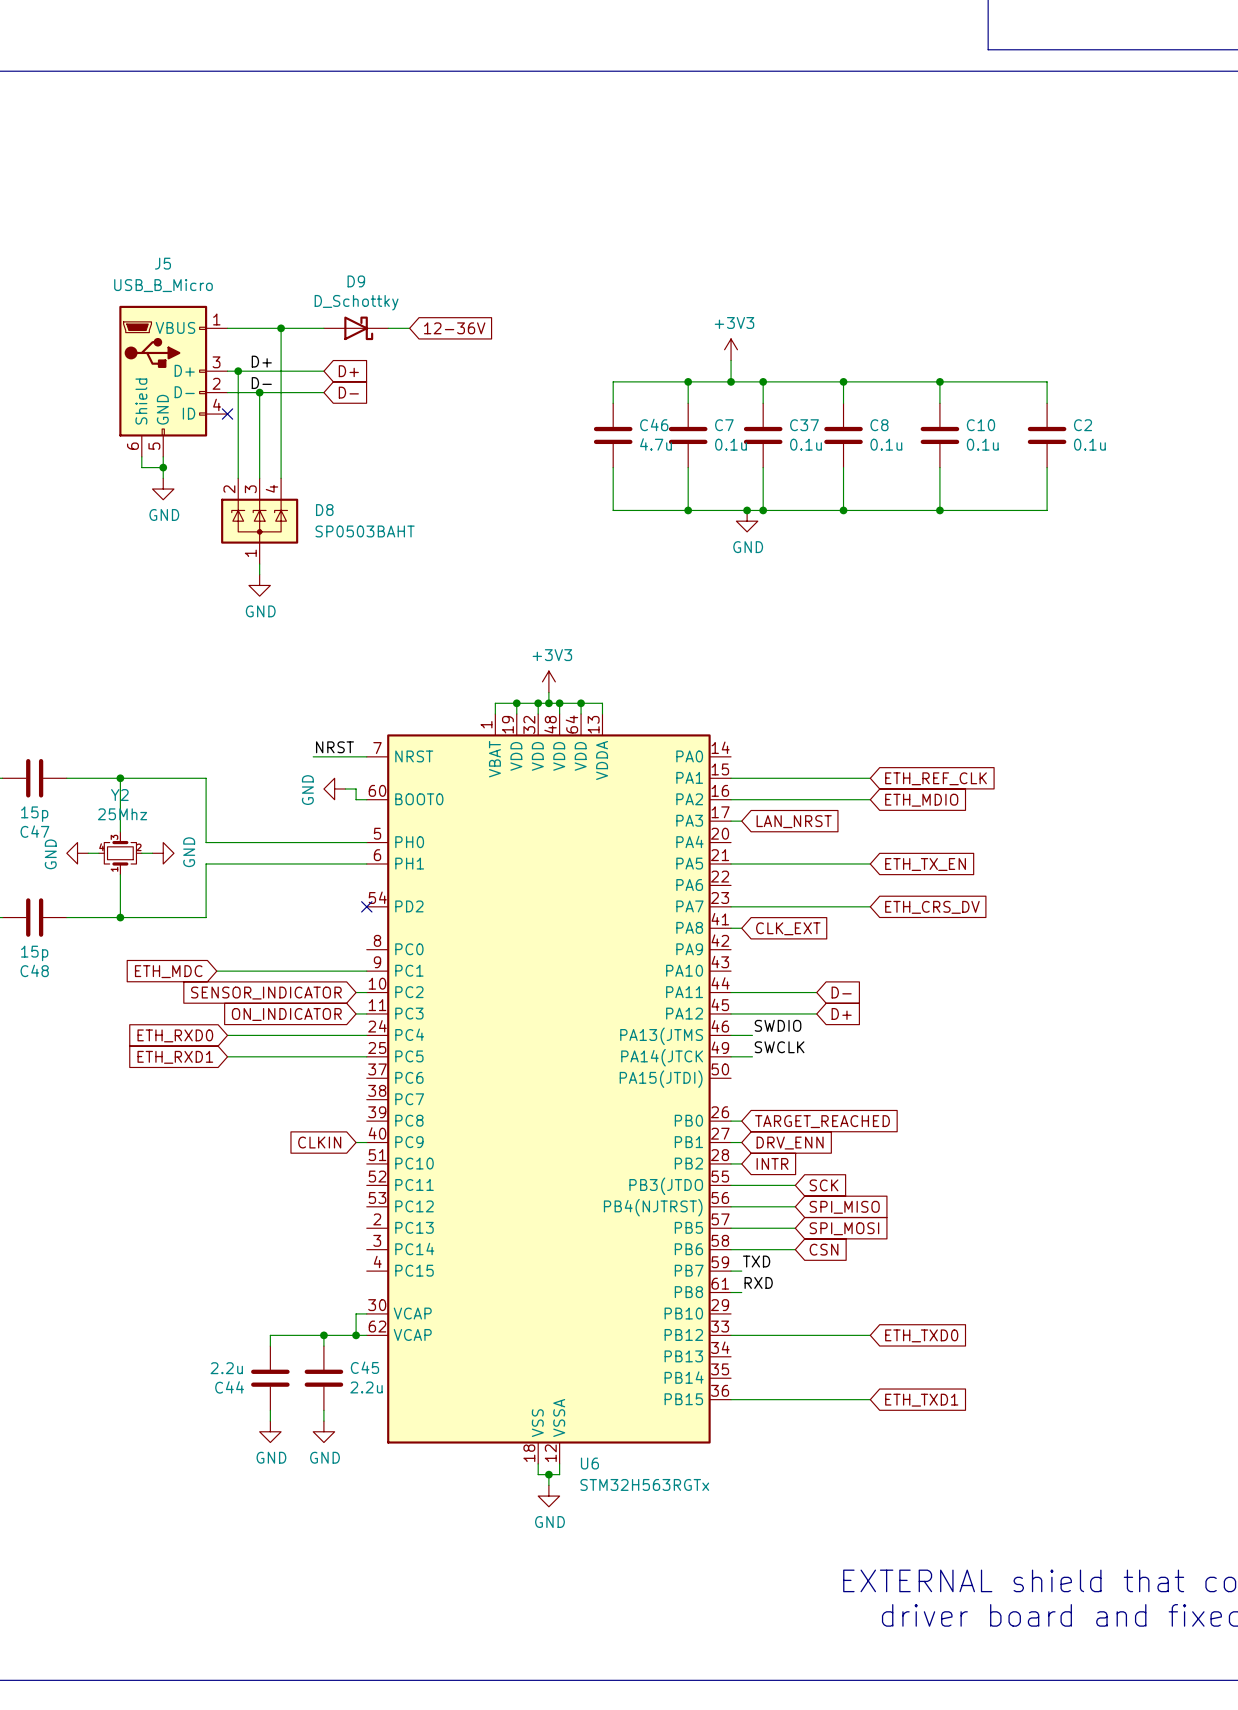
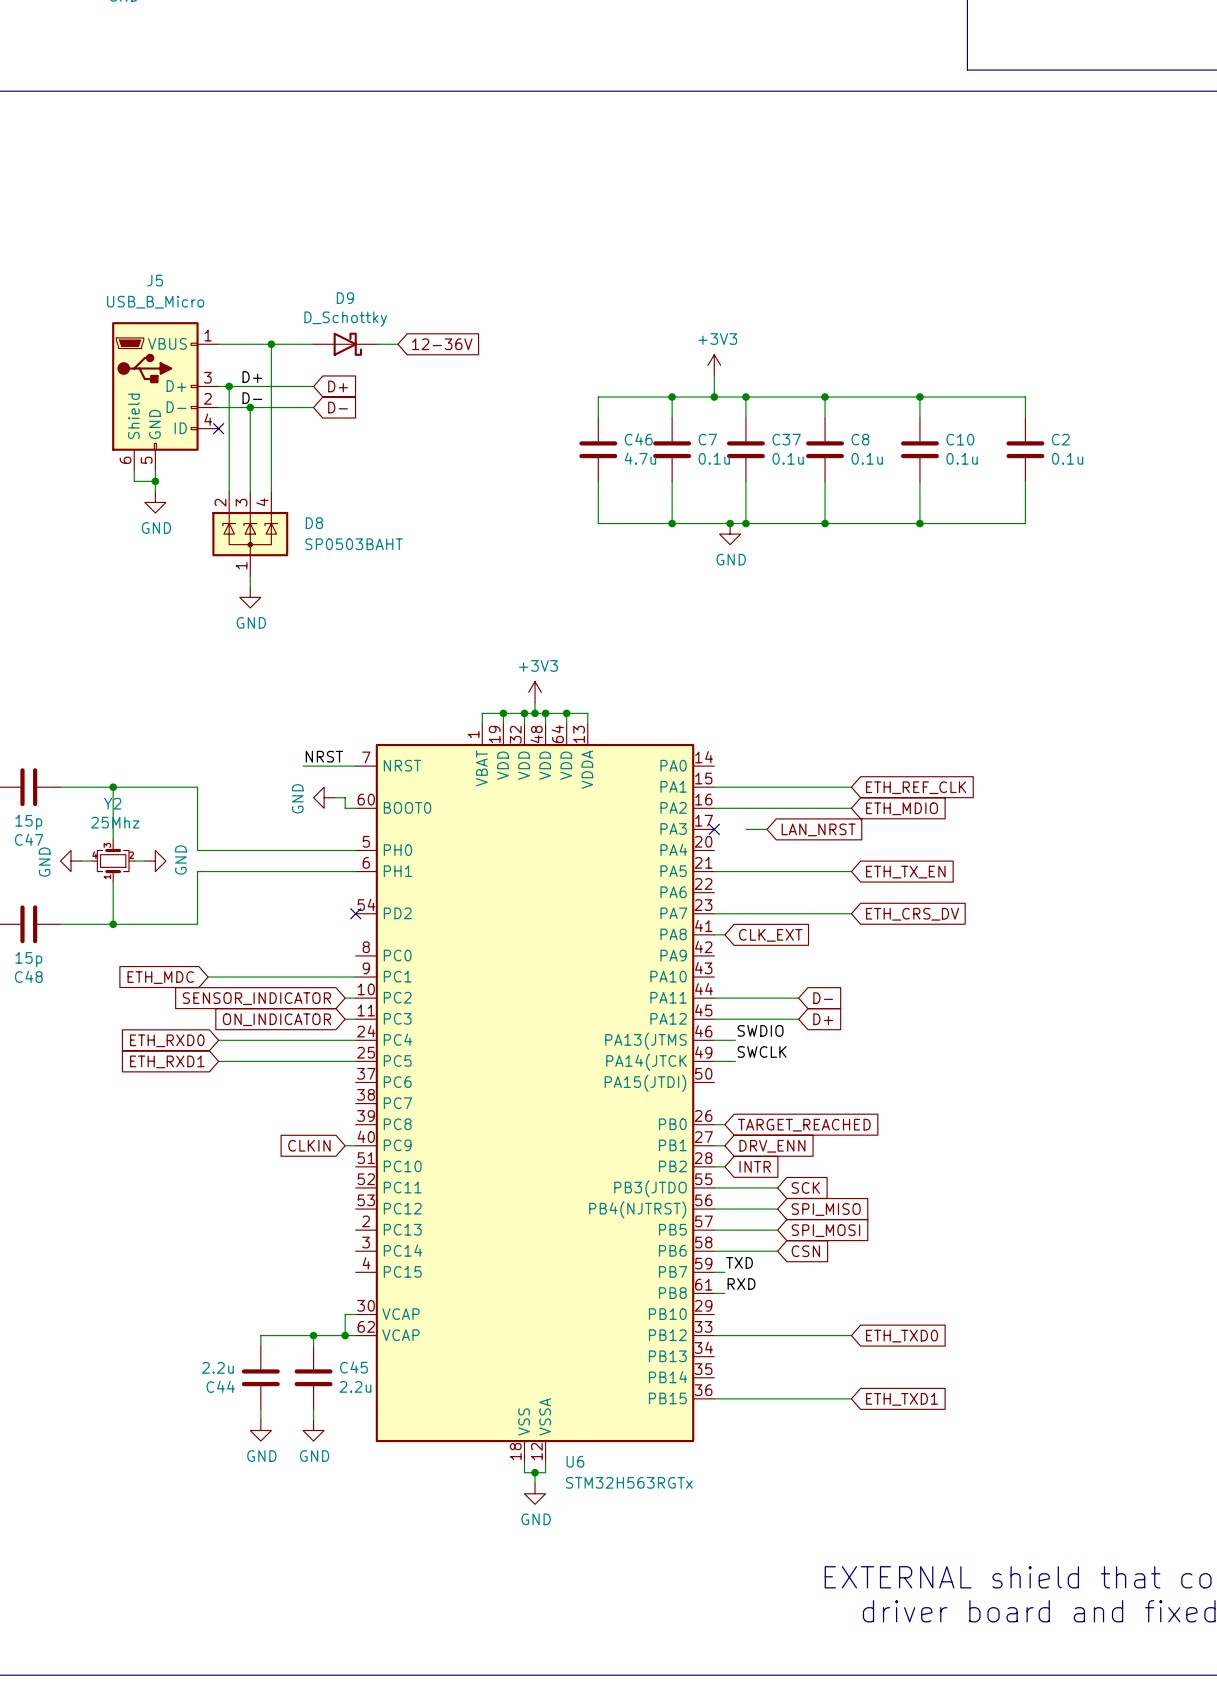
wire: (731, 821) (741, 821) -> none
no-connect mark: none -> (714, 829)
wire: none -> (745, 829) (767, 829)
global label position: LAN_NRST (794, 821) -> LAN_NRST (818, 829)

